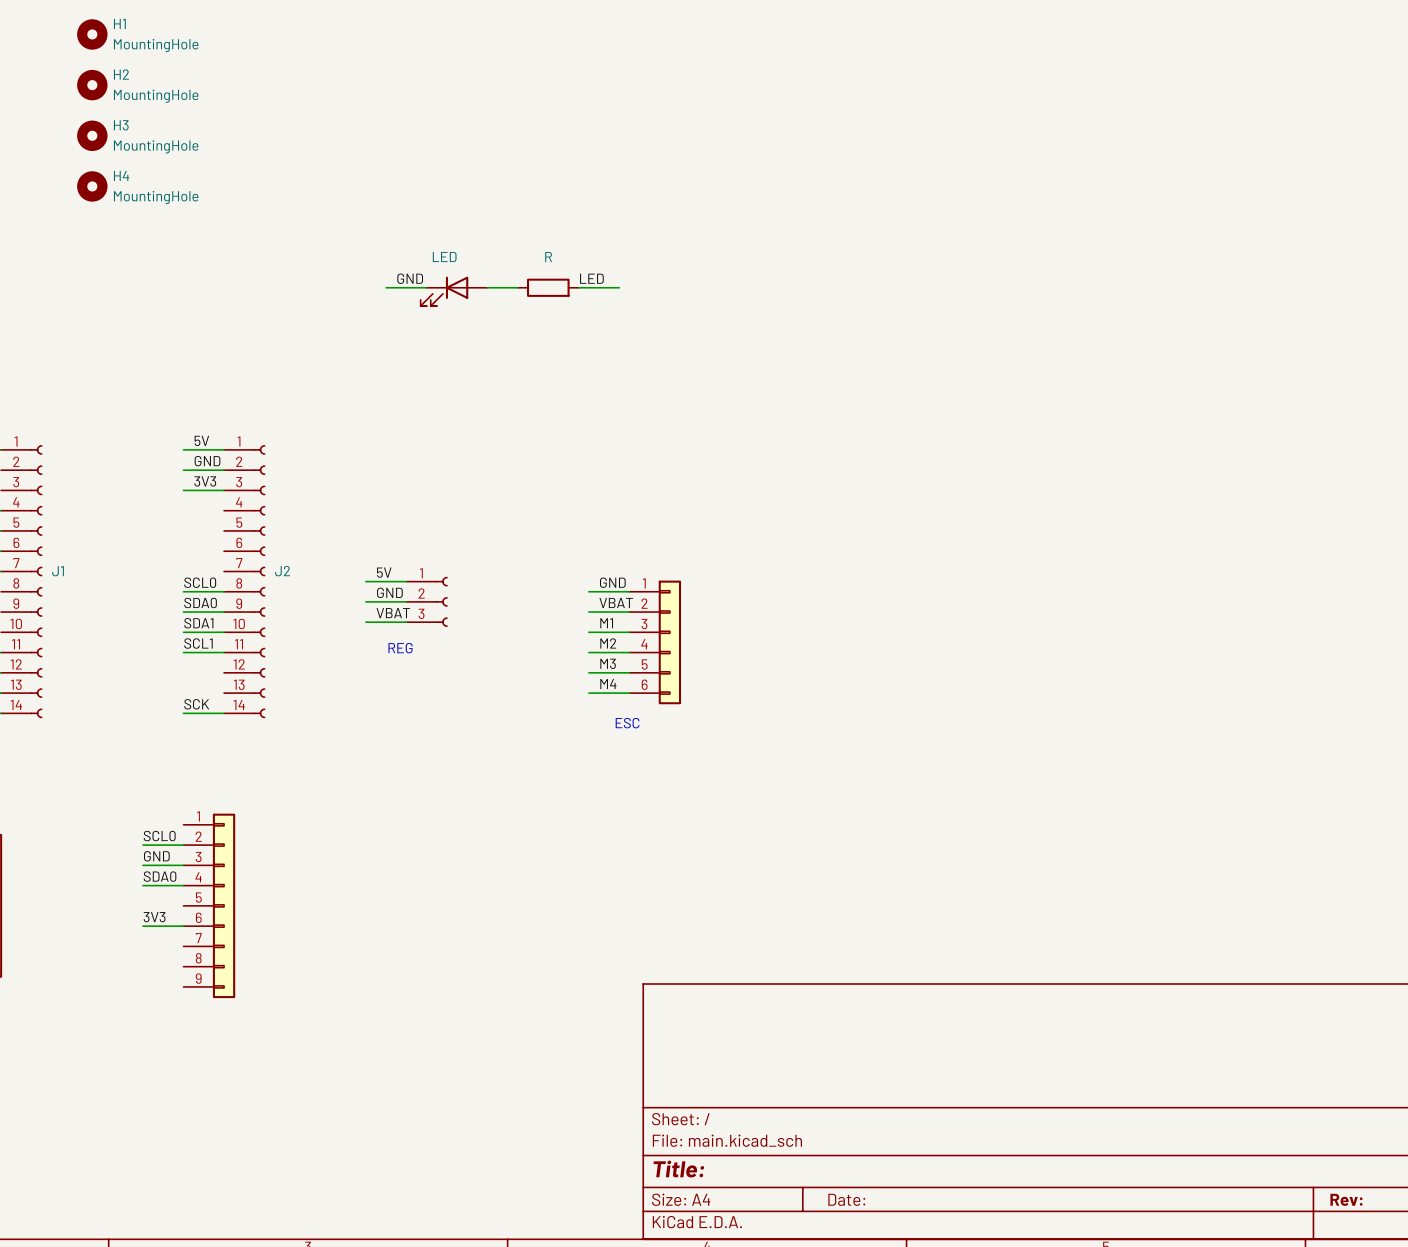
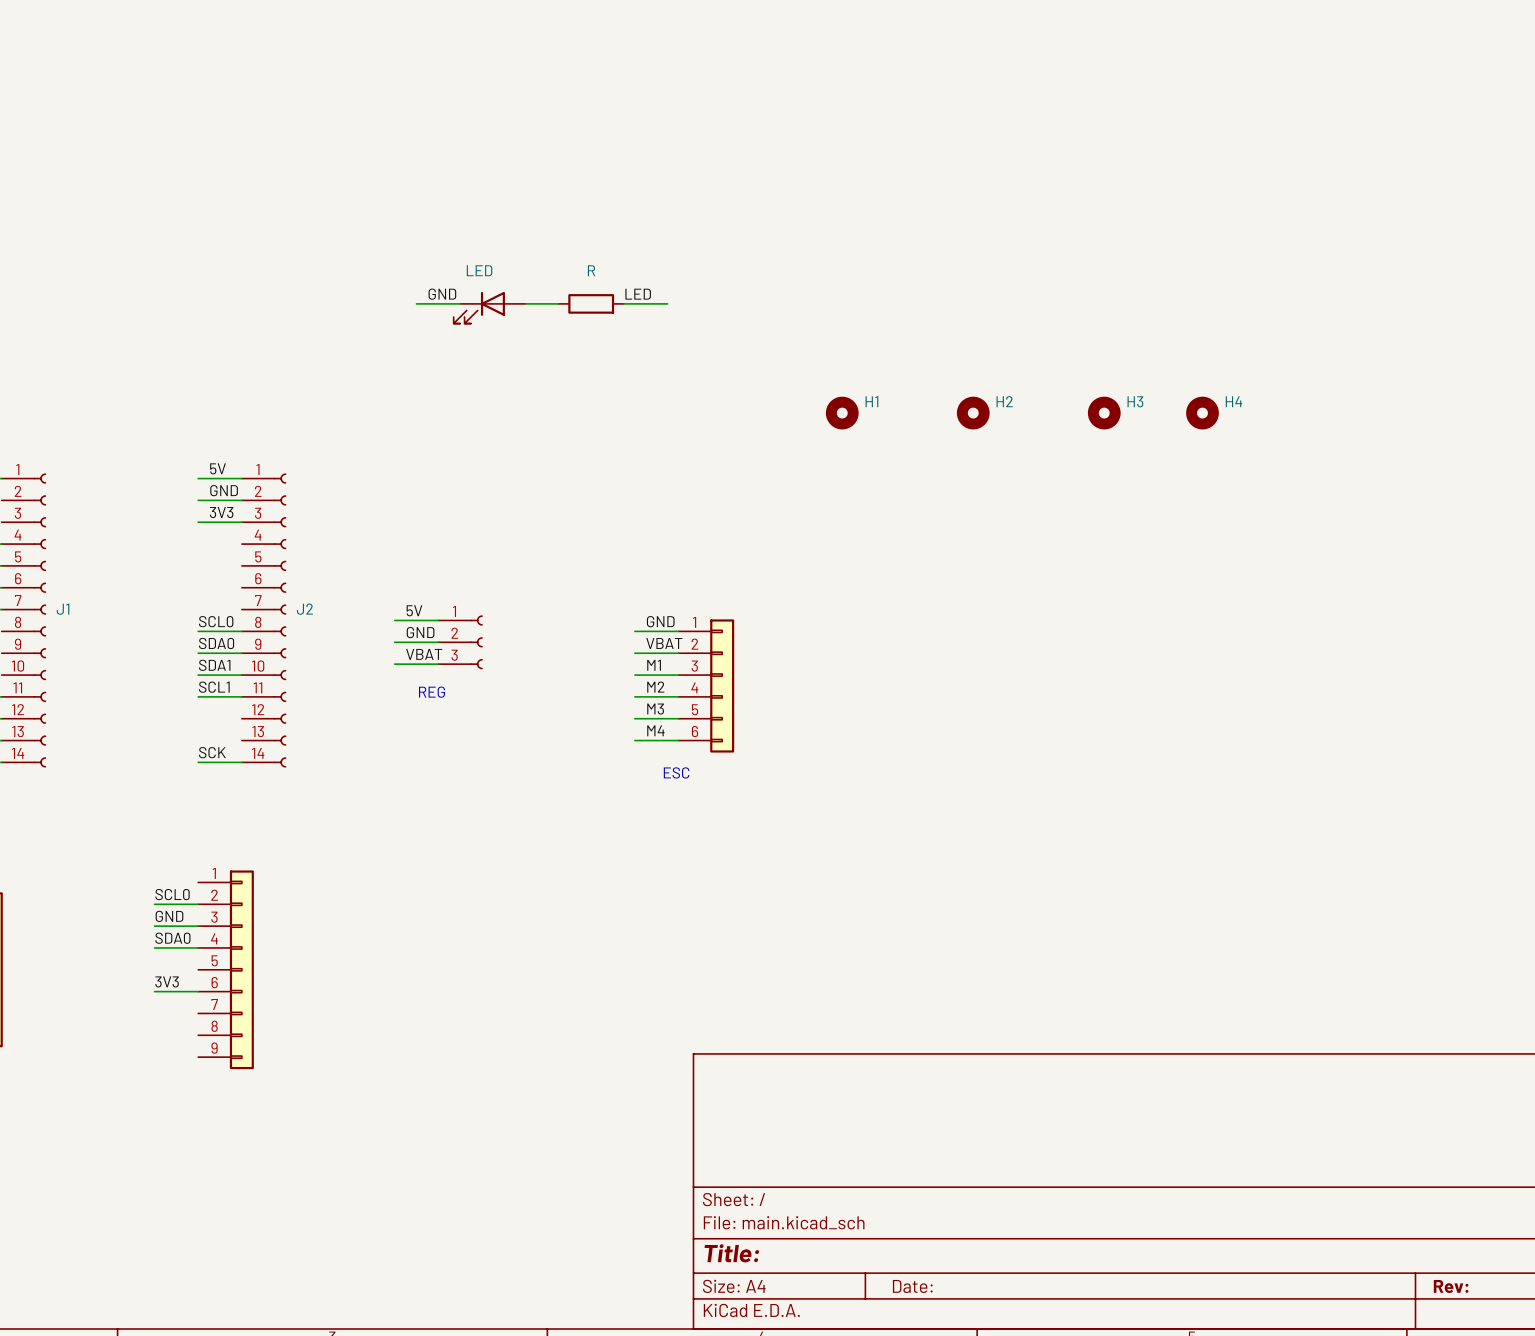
H1 position: (92, 34) -> (842, 413)
H1 value: MountingHole (156, 45) -> none
H2 position: (92, 85) -> (973, 413)
H2 value: MountingHole (156, 96) -> none
H3 position: (92, 135) -> (1104, 413)
H3 value: MountingHole (156, 146) -> none
H4 position: (92, 186) -> (1202, 413)
H4 value: MountingHole (156, 197) -> none

